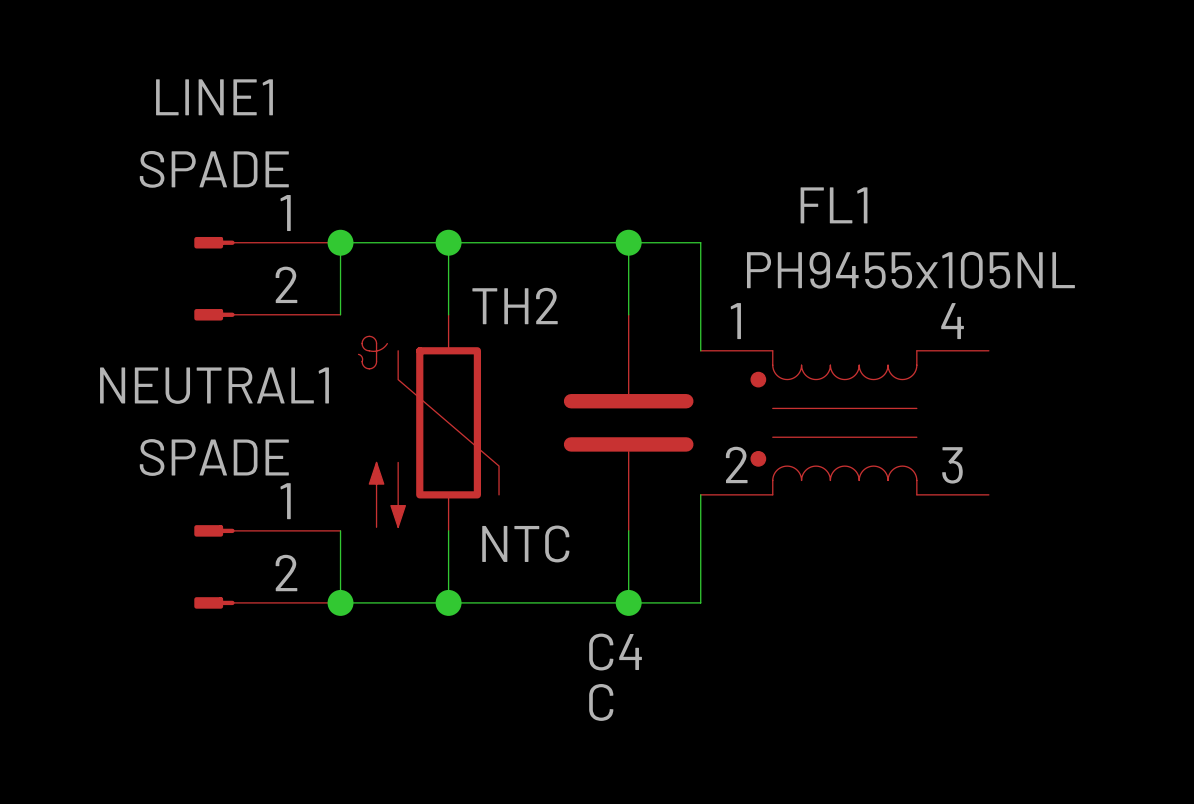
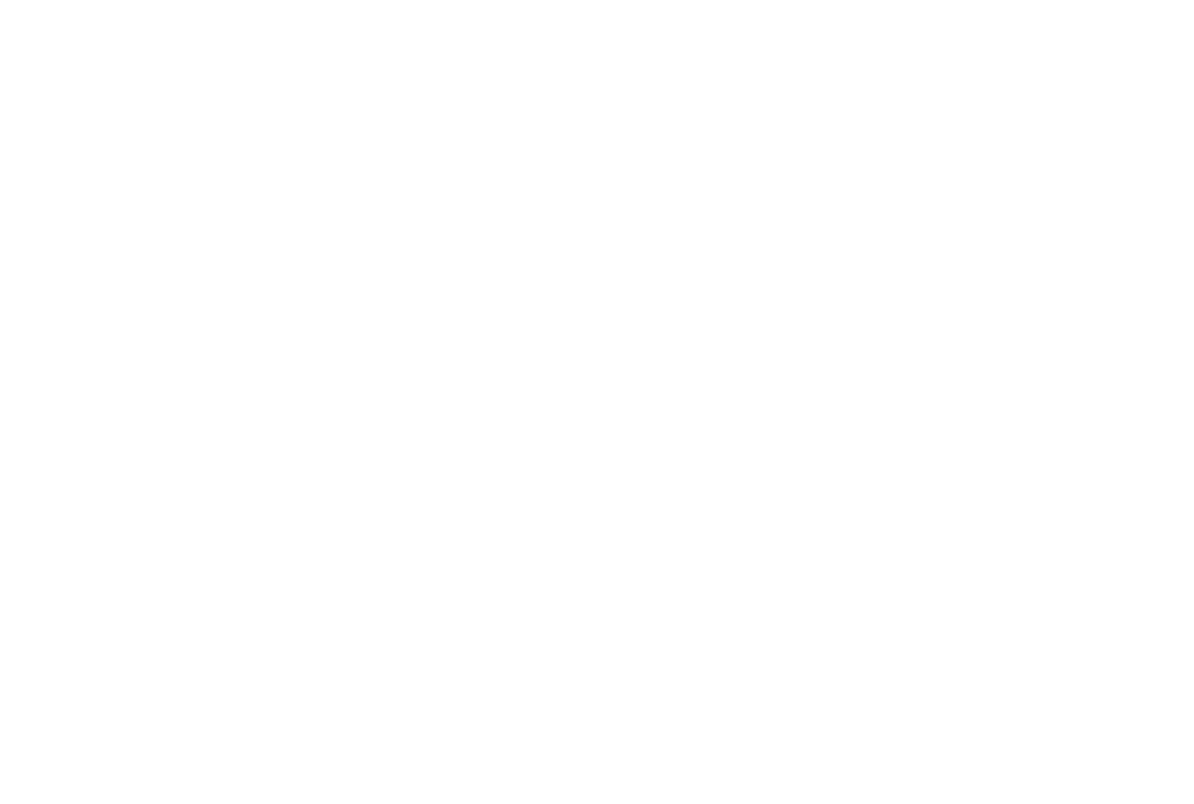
junction: (340, 242) -> none
wire: (448, 242) (448, 314) -> none
junction: (448, 242) -> none
wire: (628, 242) (628, 314) -> none
junction: (628, 242) -> none
LINE1: SPADE (267, 278) -> none
wire: (340, 314) (340, 242) (700, 242) (700, 350) -> none
TH2: NTC (428, 422) -> none
C4: C (628, 422) -> none
FL1: PH9455x105NL (844, 422) -> none
wire: (700, 494) (700, 602) (340, 602) (340, 530) -> none
wire: (448, 530) (448, 602) -> none
wire: (628, 530) (628, 602) -> none
NEUTRAL1: SPADE (267, 566) -> none
junction: (340, 602) -> none
junction: (448, 602) -> none
junction: (628, 602) -> none

